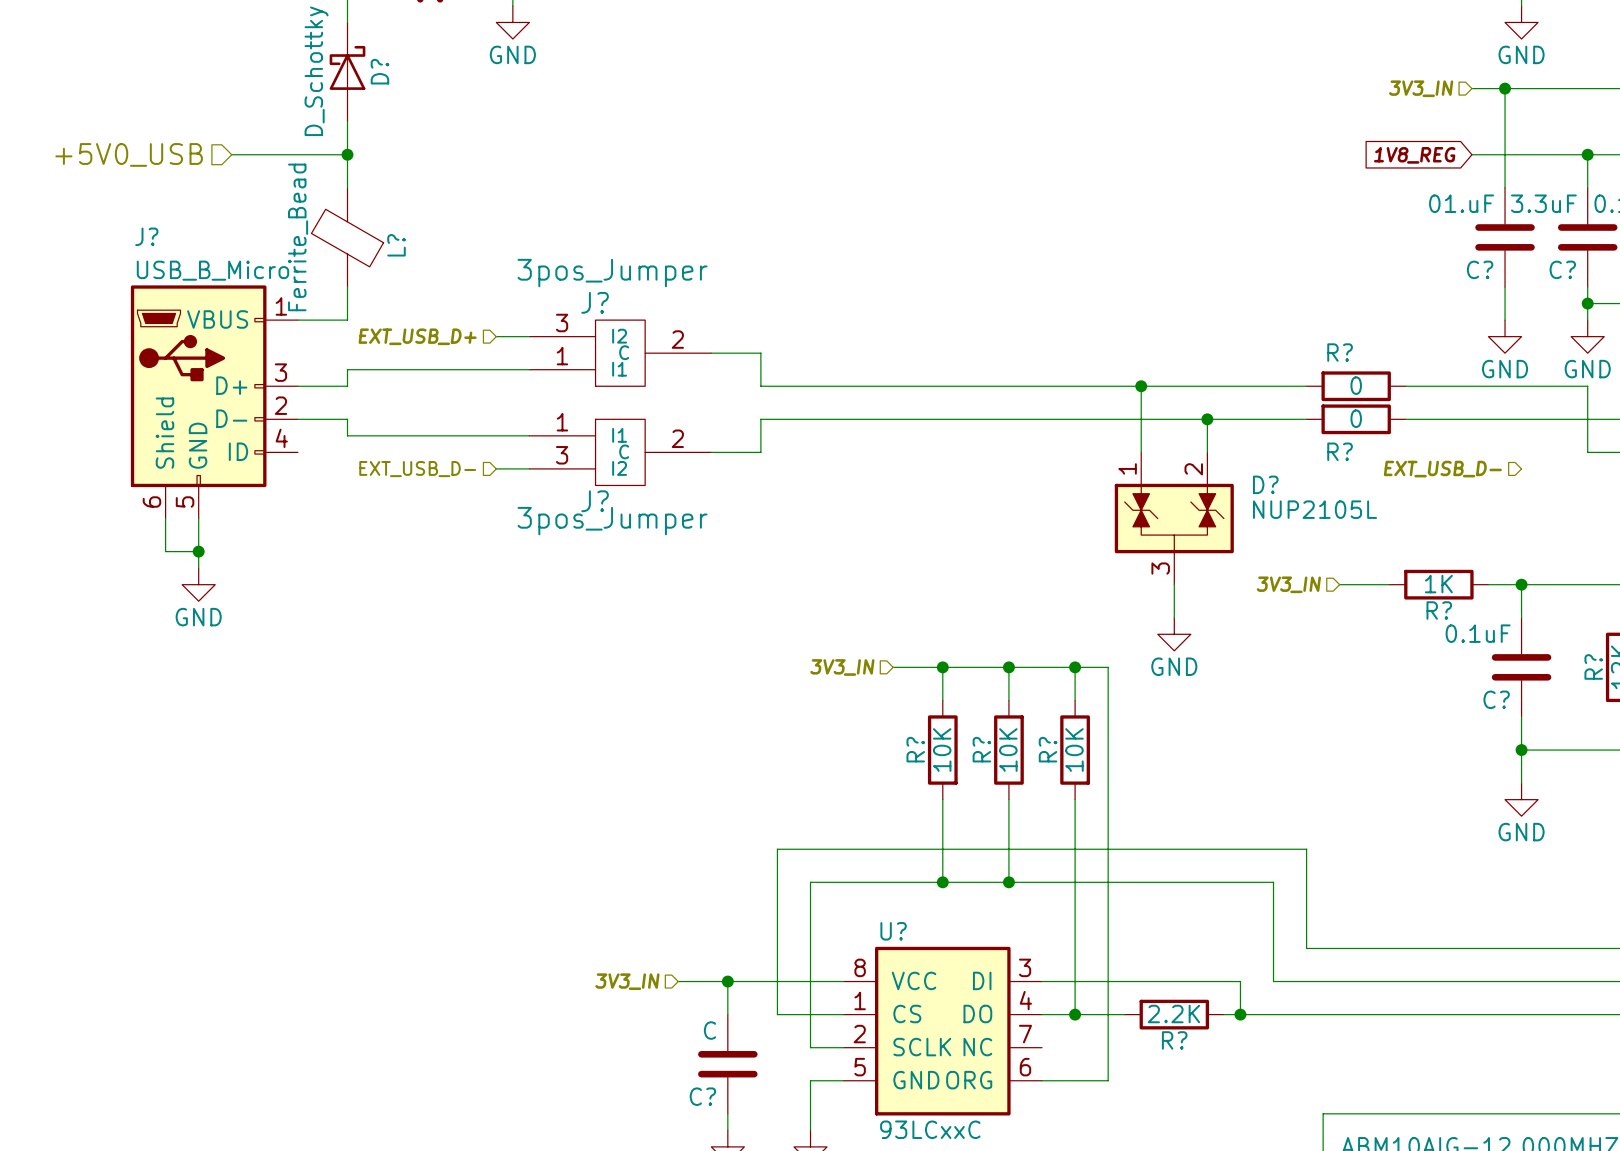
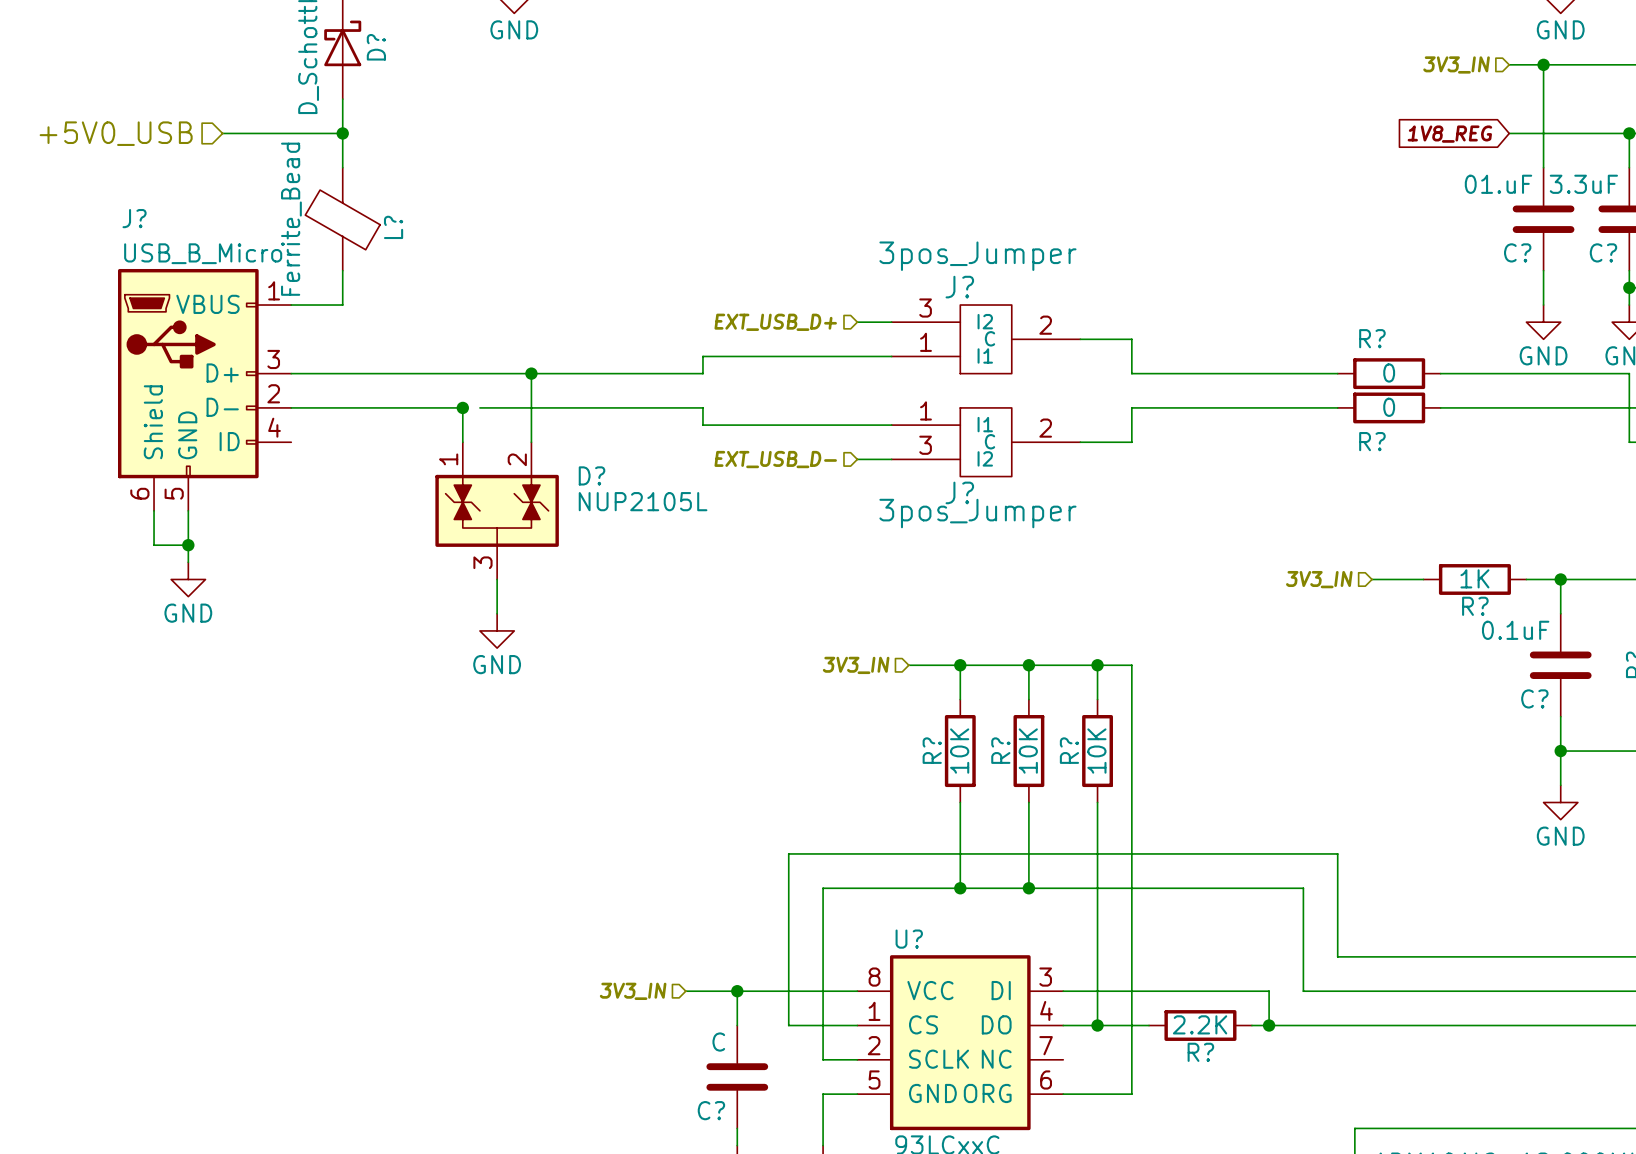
hierarchical label: EXT_USB_D+ (417, 336) -> none
wire: (496, 336) (529, 336) -> none
hierarchical label: none -> EXT_USB_D+ (775, 322)
wire: none -> (857, 322) (891, 322)
J?: 3pos_Jumper (620, 353) -> none
wire: (711, 353) (760, 353) (760, 386) (1108, 386) -> (1080, 339) (1131, 339) (1131, 373)
J?: none -> 3pos_Jumper (986, 339)
wire: (529, 369) (347, 369) (347, 386) -> (891, 356) (702, 356) (702, 373) (342, 373)
wire: none -> (531, 373) (531, 442)
junction: none -> (531, 373)
wire: (1141, 386) (1141, 452) -> none
junction: (1141, 386) -> none
wire: (347, 419) (347, 435) (529, 435) -> (342, 407) (462, 407) (462, 442)
junction: none -> (462, 407)
wire: none -> (479, 407) (702, 407) (702, 425) (891, 425)
wire: (1108, 419) (760, 419) (760, 452) (711, 452) -> (1131, 407) (1131, 442) (1080, 442)
wire: (1207, 419) (1207, 452) -> none
junction: (1207, 419) -> none
J?: 3pos_Jumper (620, 452) -> none
J?: none -> 3pos_Jumper (986, 442)
wire: (496, 468) (529, 468) -> none
wire: none -> (857, 459) (891, 459)
hierarchical label: EXT_USB_D- (417, 469) -> none
hierarchical label: none -> EXT_USB_D- (775, 459)
hierarchical label: EXT_USB_D- (1442, 469) -> none
D?: none -> NUP2105L (497, 510)
D?: NUP2105L (1174, 518) -> none
wire: none -> (497, 579) (497, 613)
wire: (1174, 584) (1174, 617) -> none
power symbol: none -> GND (497, 630)
power symbol: GND (1174, 634) -> none

